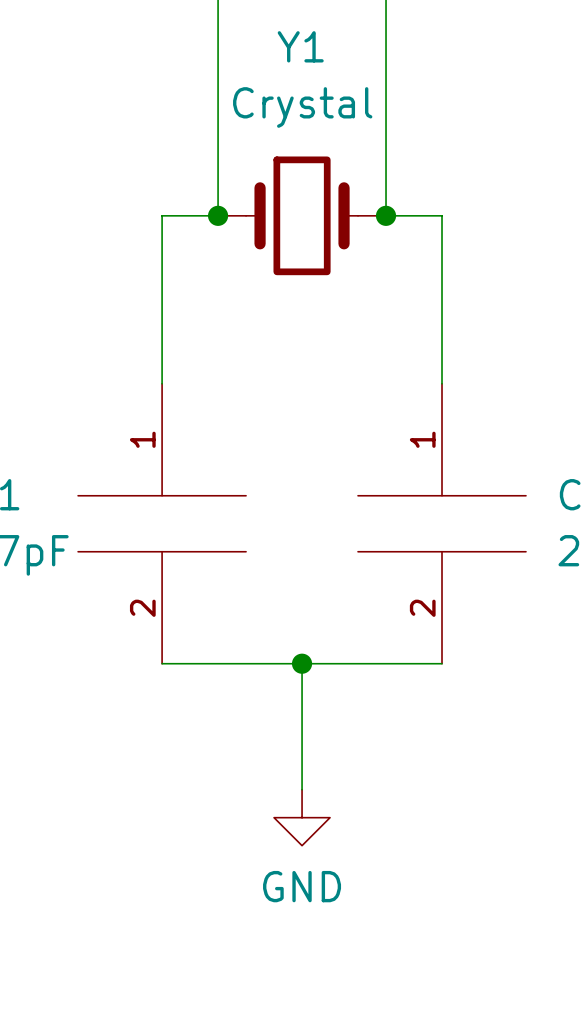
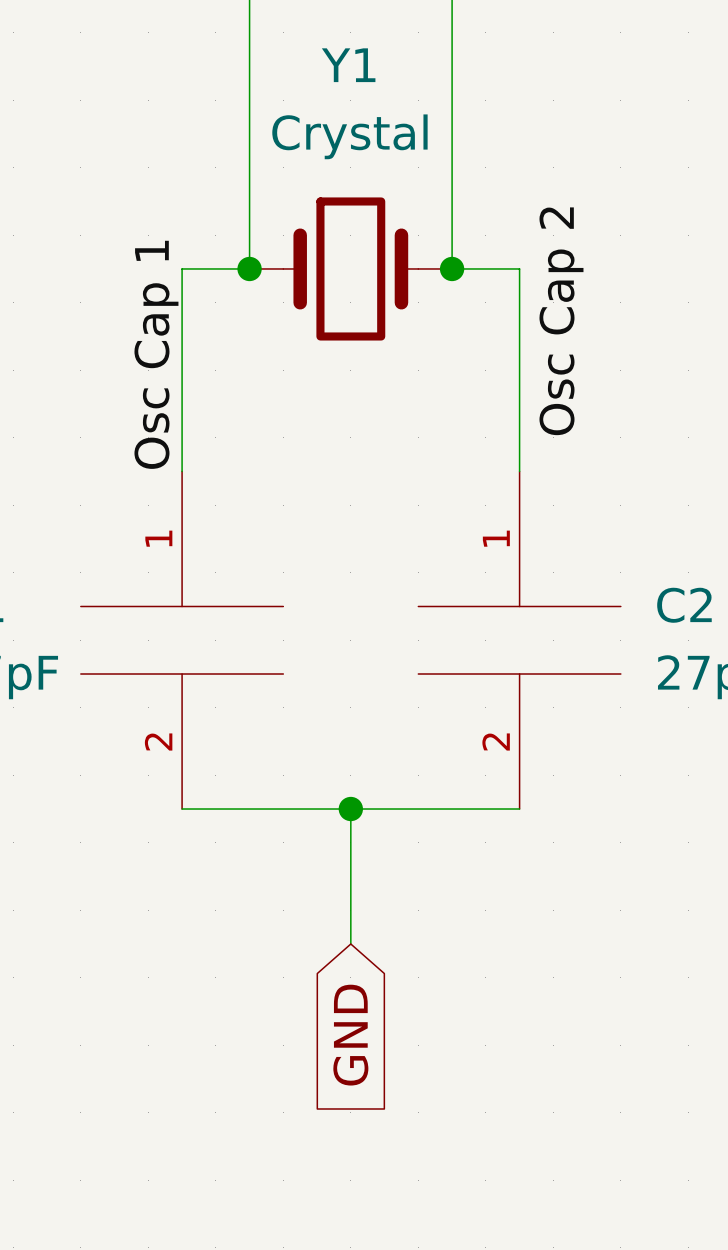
label: none -> Osc Cap 2 (561, 321)
label: none -> Osc Cap 1 (156, 354)
wire: (302, 775) (302, 789) -> none
power symbol: GND (302, 817) -> none
global label: none -> GND (350, 1035)

